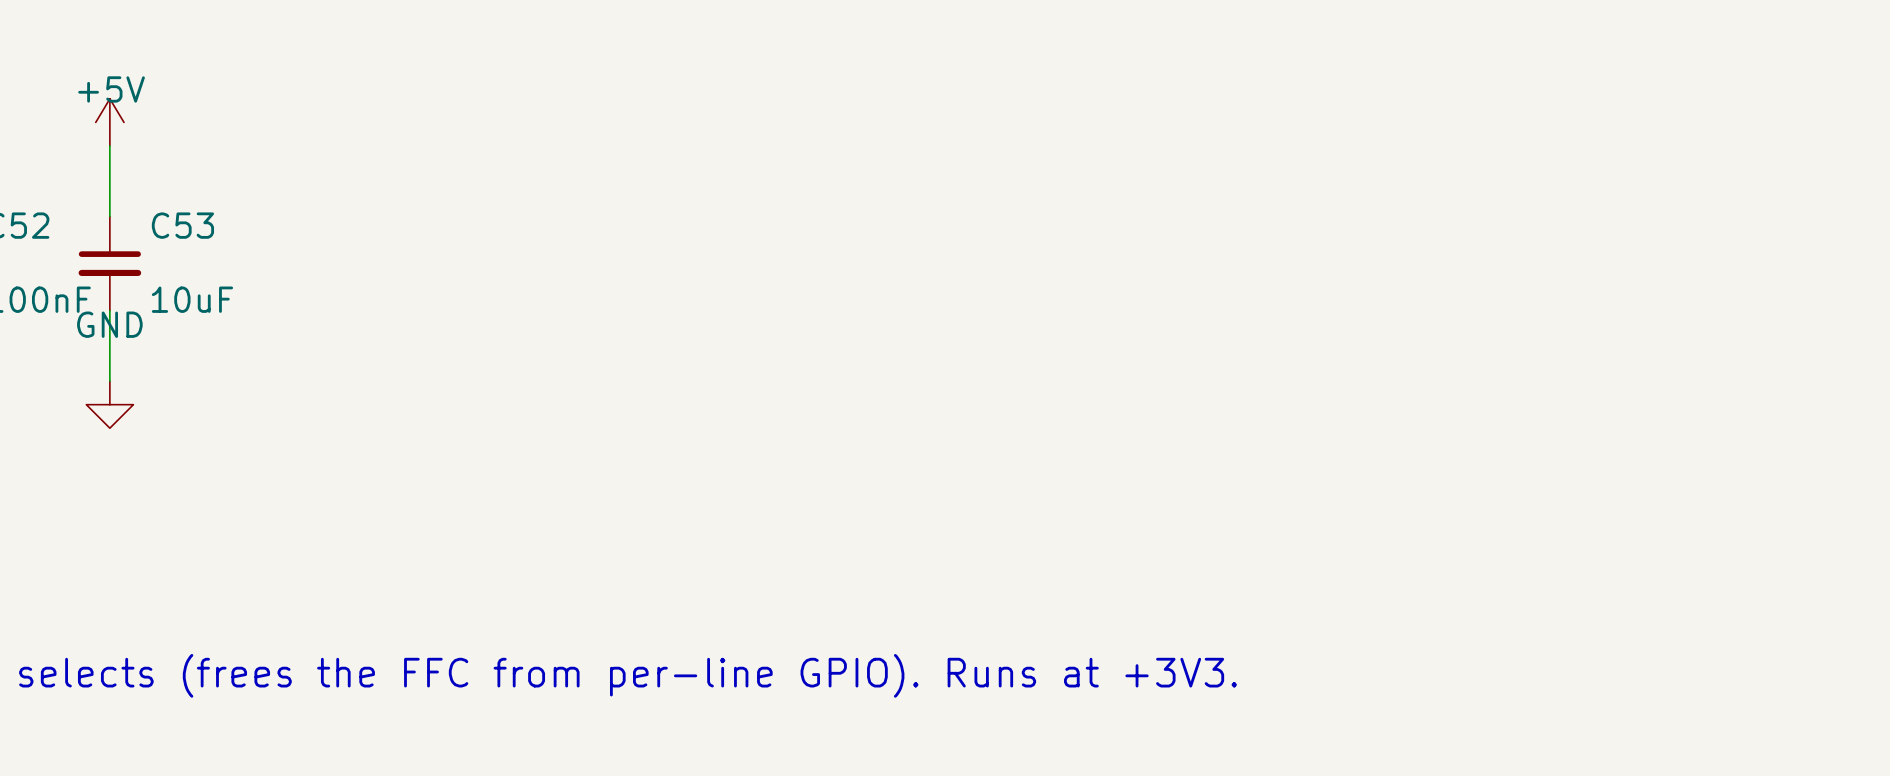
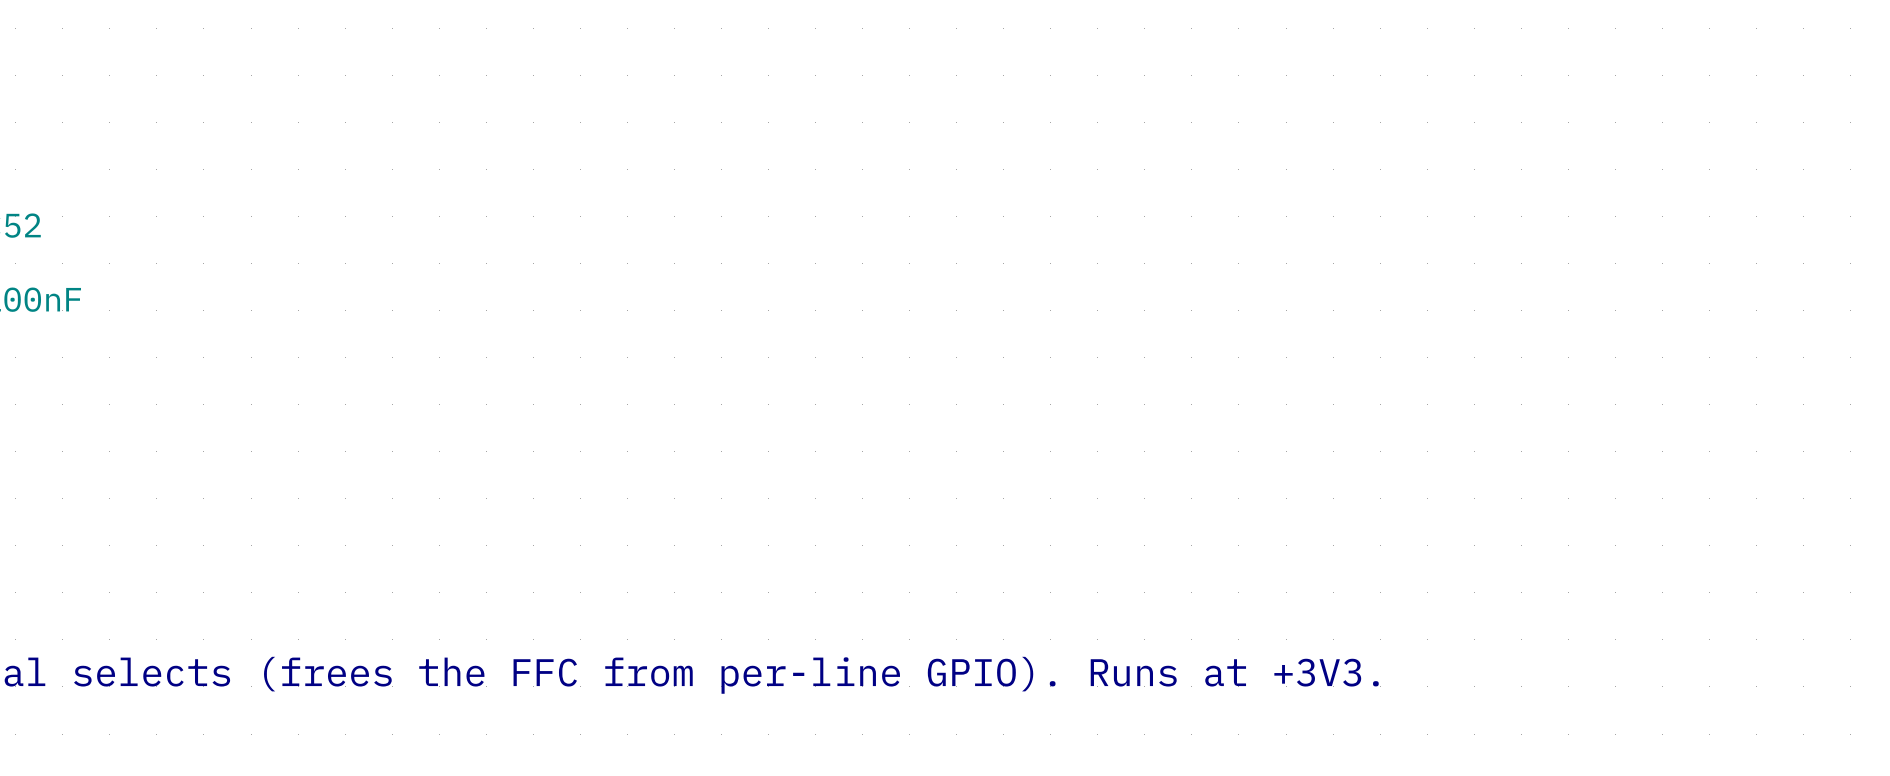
power symbol: +5V (109, 122) -> none
wire: (109, 145) (109, 216) -> none
C53: 10uF (109, 263) -> none
wire: (109, 310) (109, 381) -> none
power symbol: GND (109, 404) -> none

